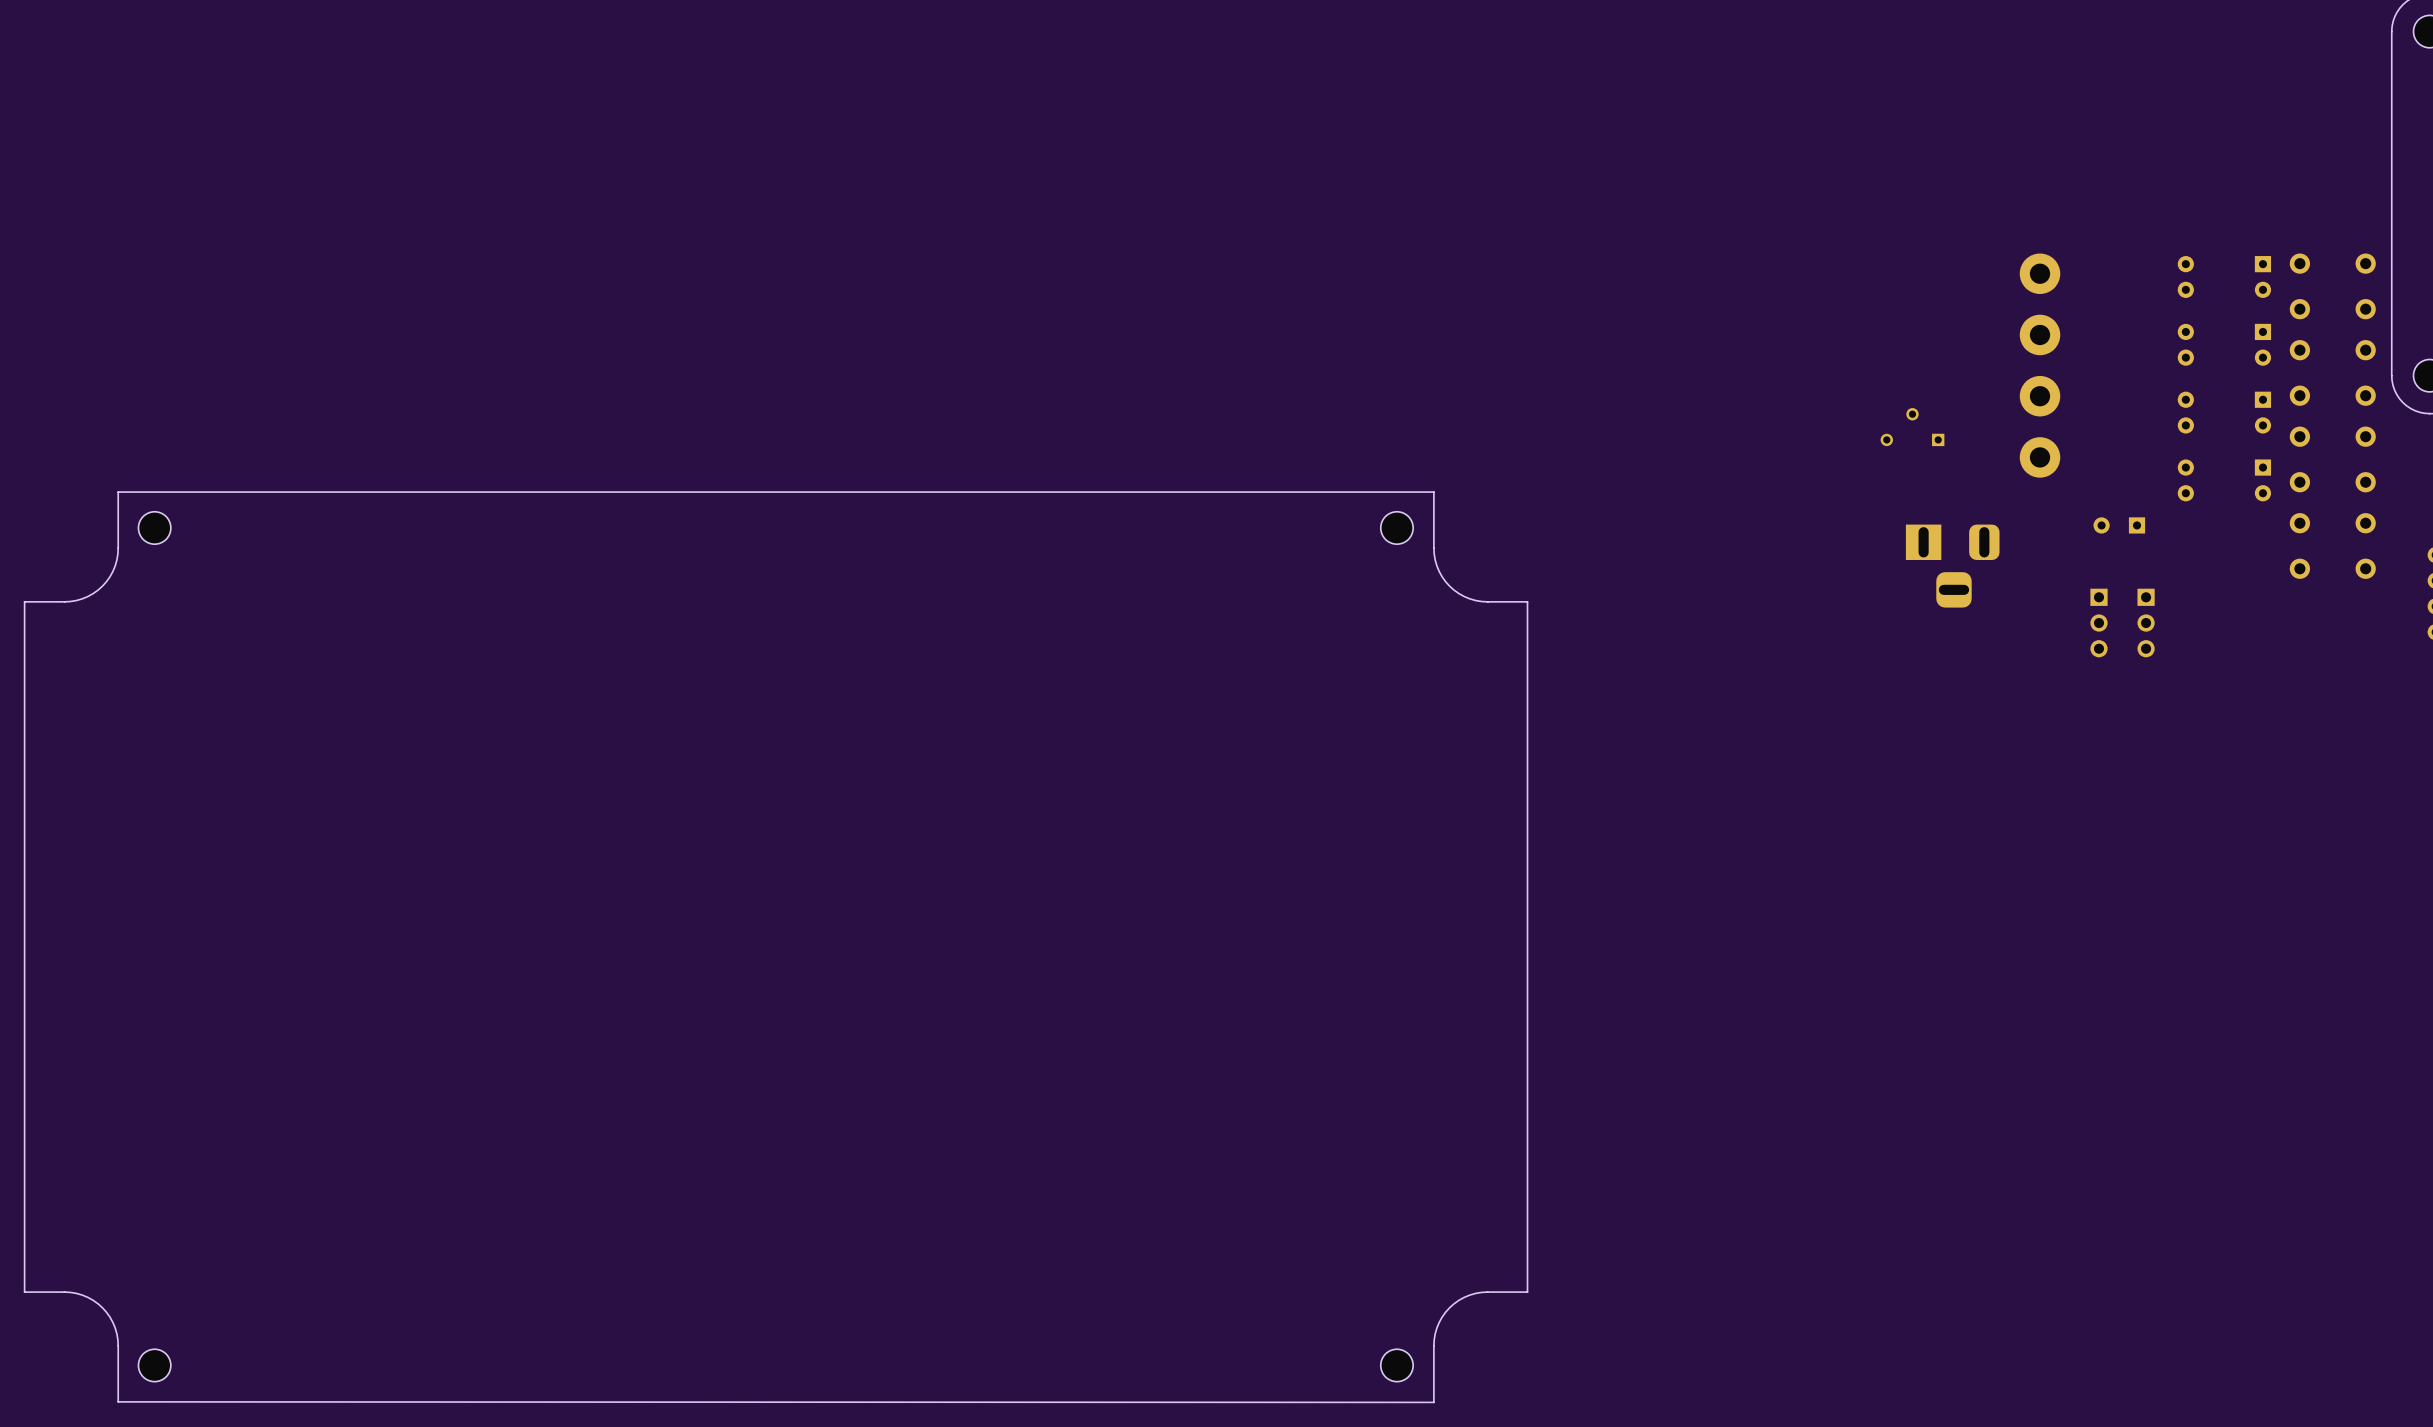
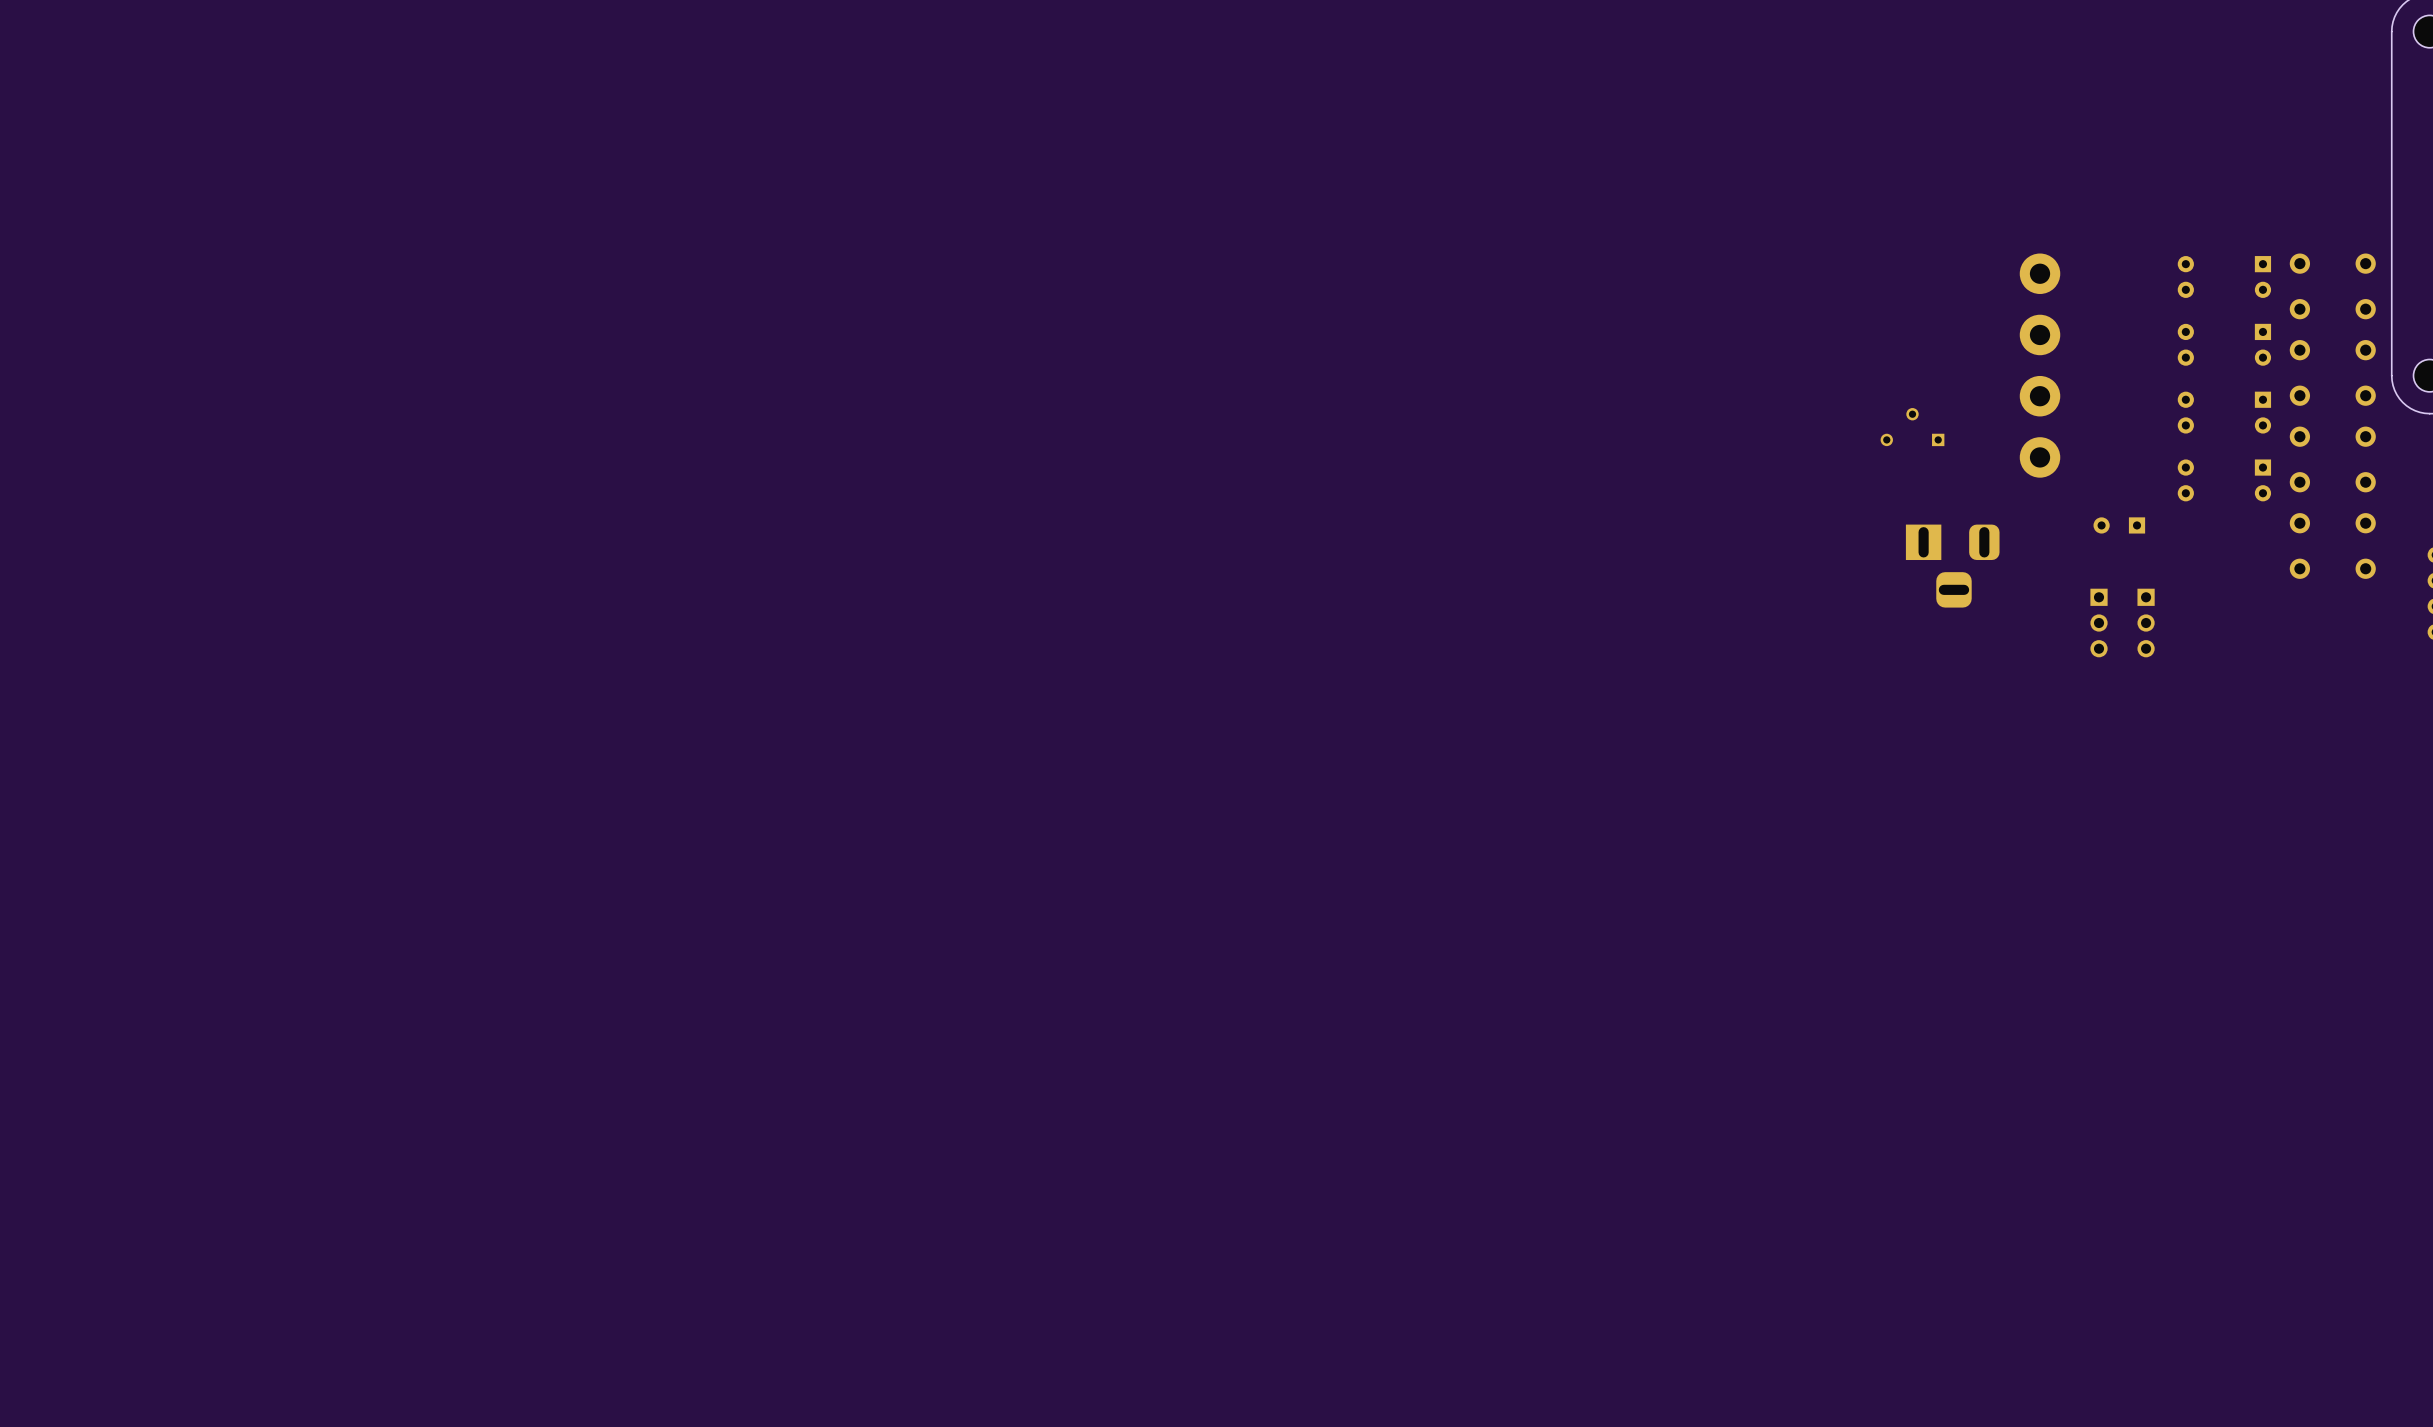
board edge: (1433, 492) (118, 492) (117, 554) (112, 571) (106, 581) (93, 593) (76, 600) (24, 601) (24, 1292) (76, 1293) (93, 1300) (106, 1312) (112, 1322) (117, 1339) (118, 1401) (1433, 1402) (1434, 1339) (1436, 1328) (1445, 1312) (1458, 1300) (1475, 1293) (1527, 1292) (1527, 601) (1475, 600) (1458, 593) (1445, 581) (1436, 565) (1434, 554) (1433, 492) -> none
part: (154, 527) -> none
part: (1396, 527) -> none
part: (154, 1365) -> none
part: (1396, 1365) -> none

